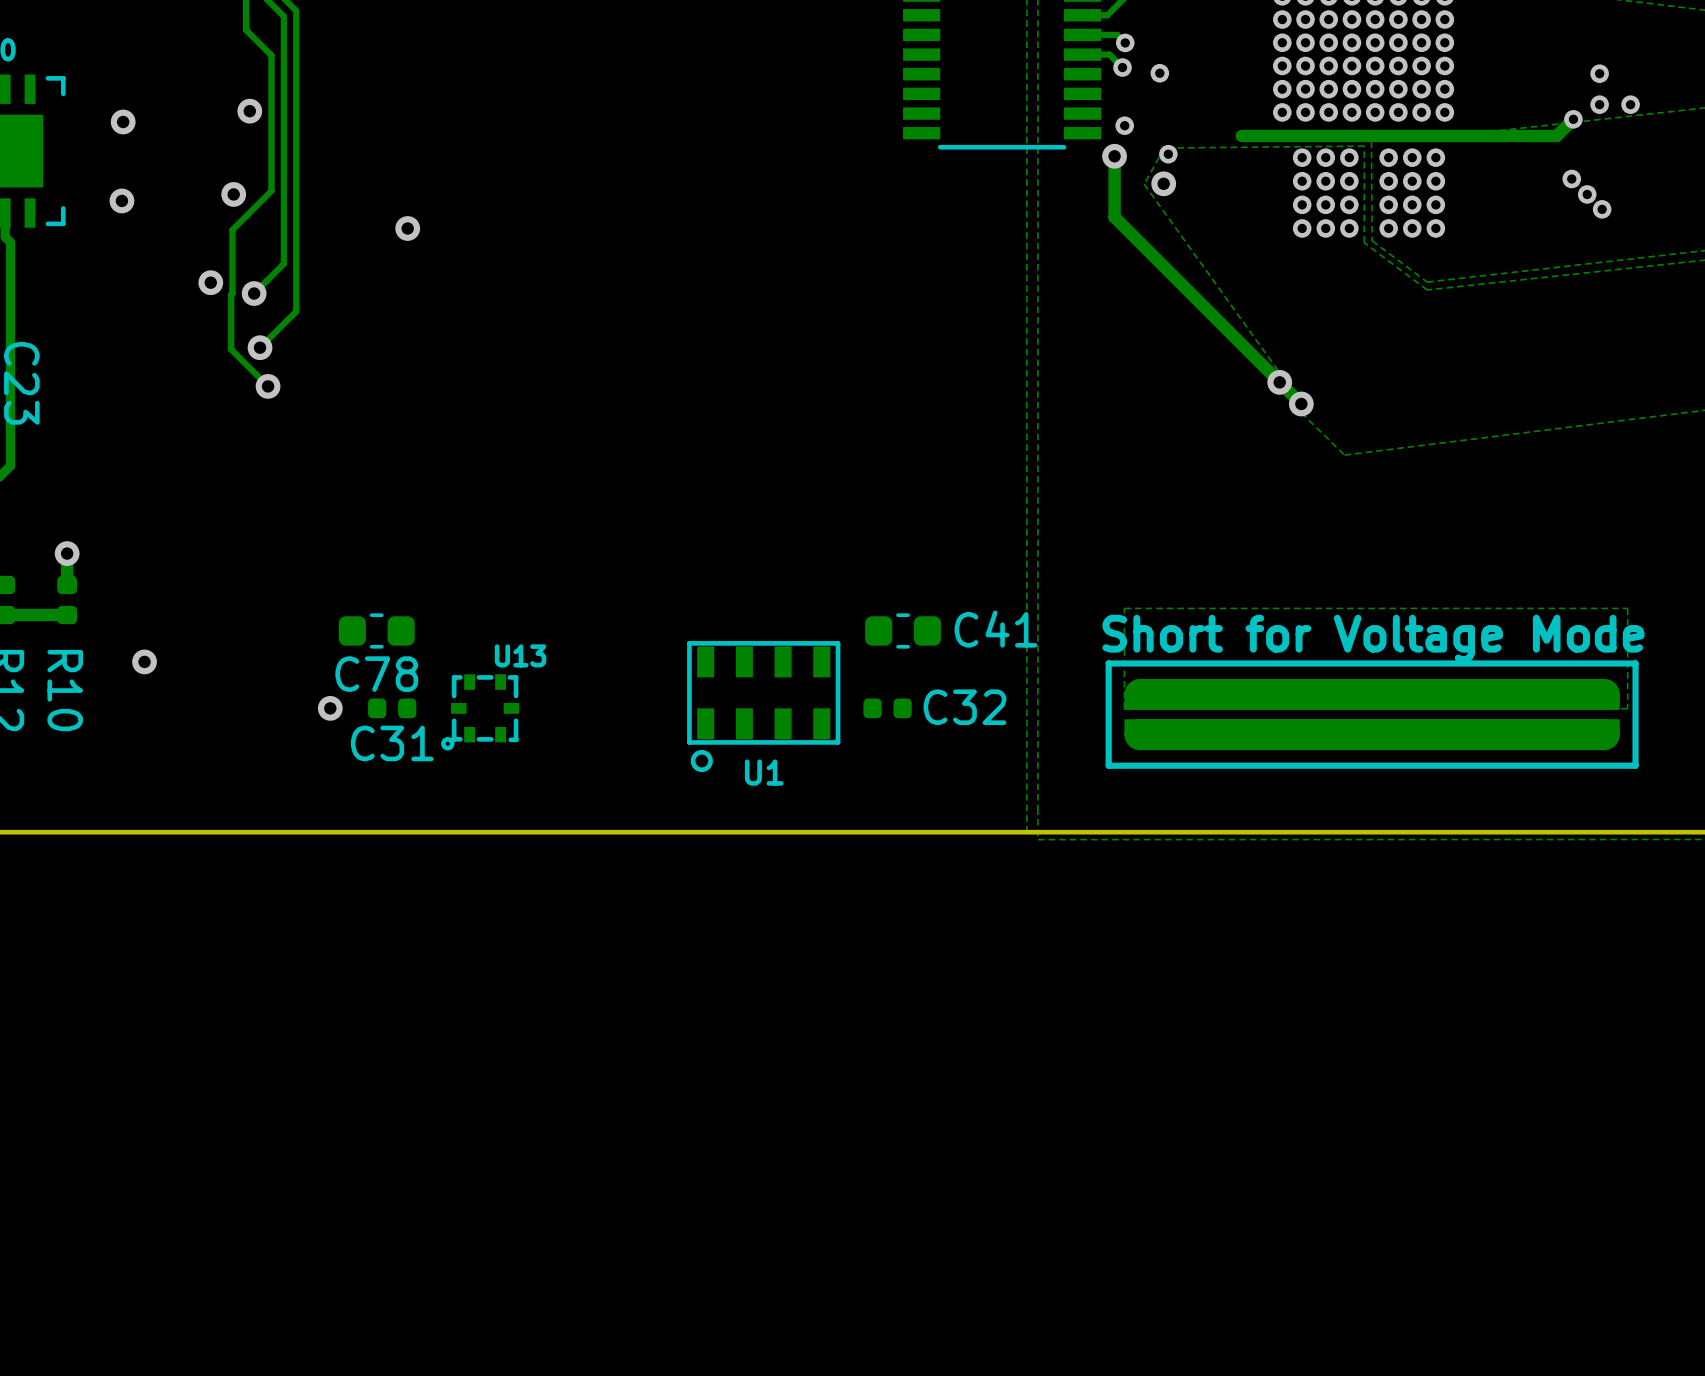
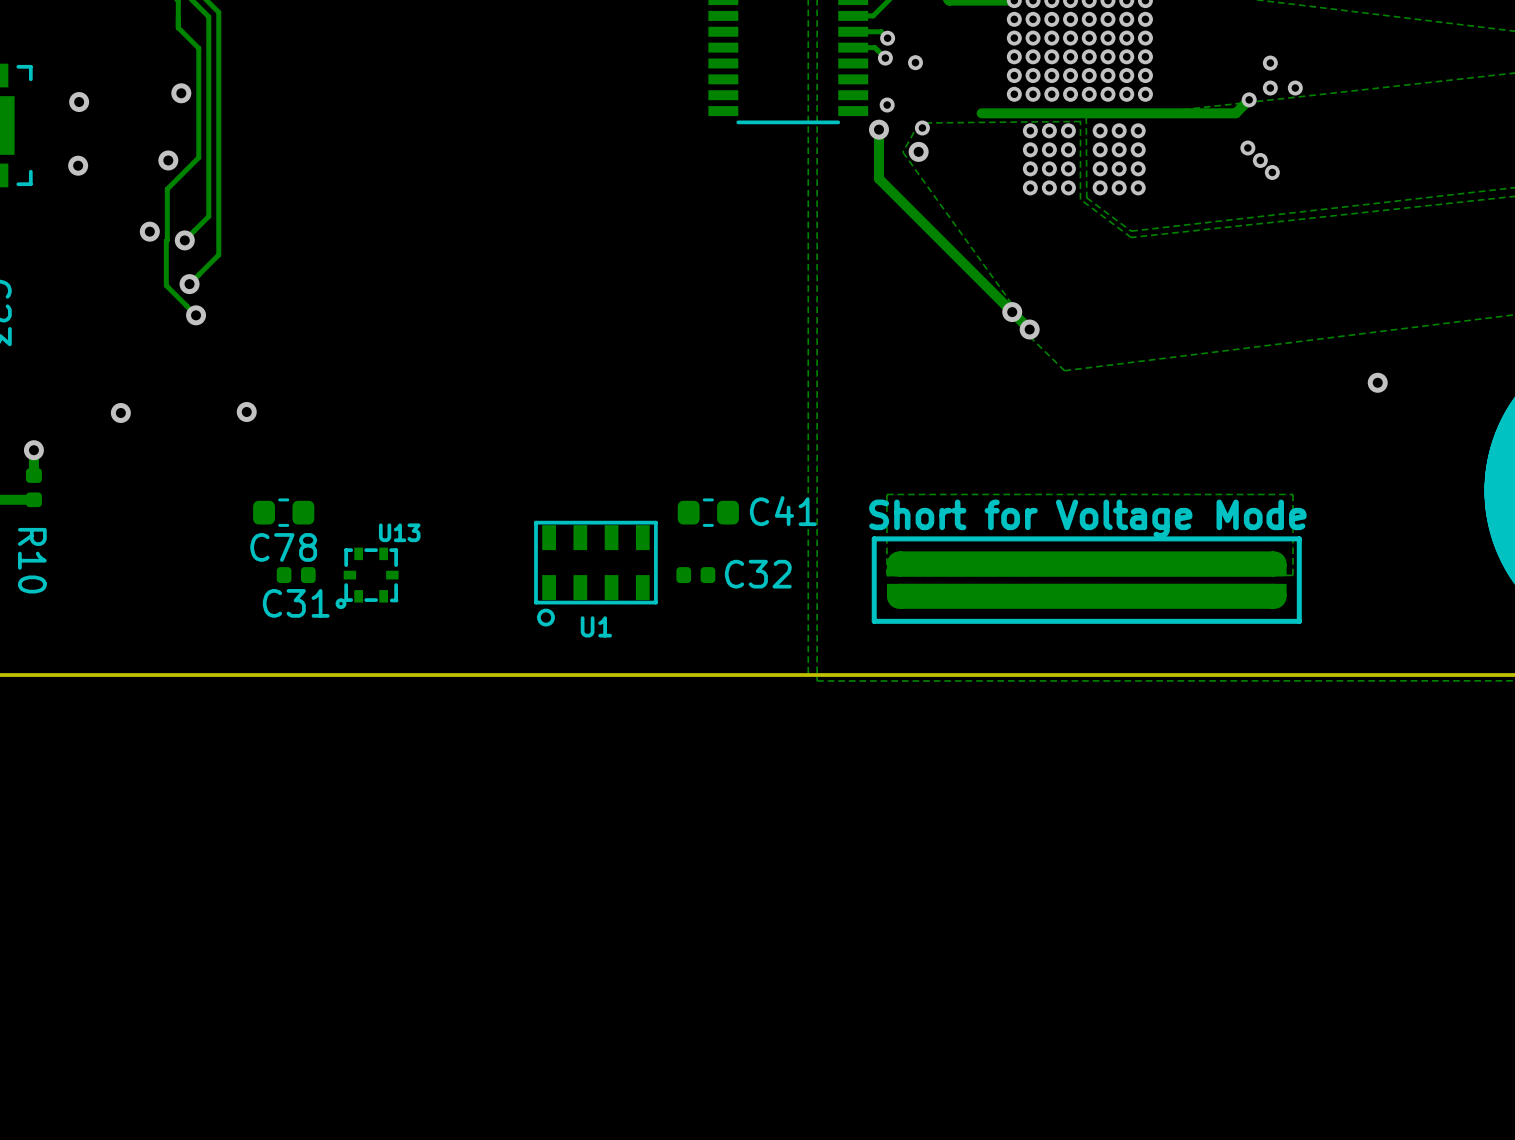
via: (407, 228) -> none
via: none -> (246, 411)
via: none -> (120, 412)
via: (144, 661) -> none
via: (330, 708) -> none

